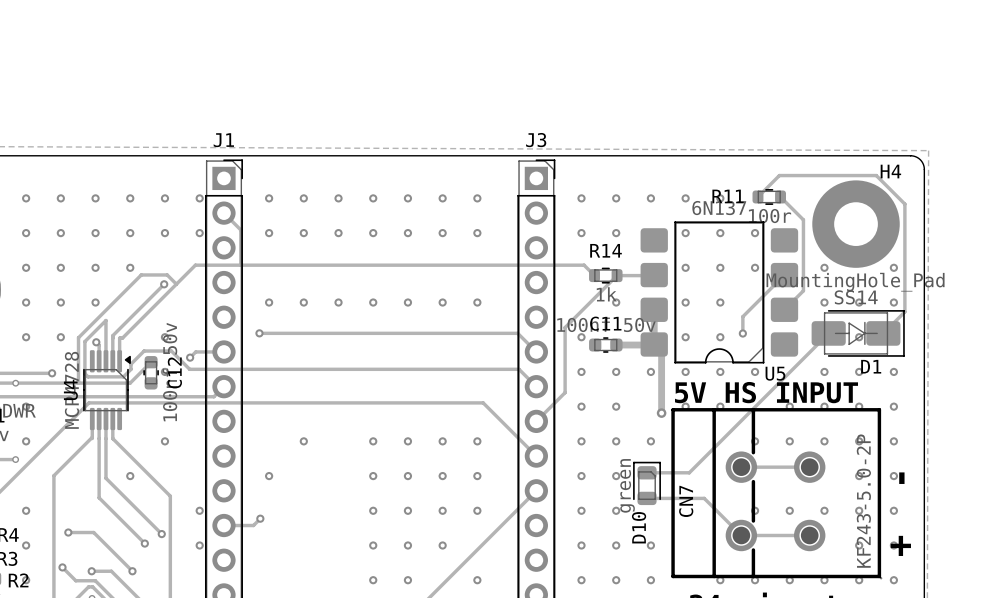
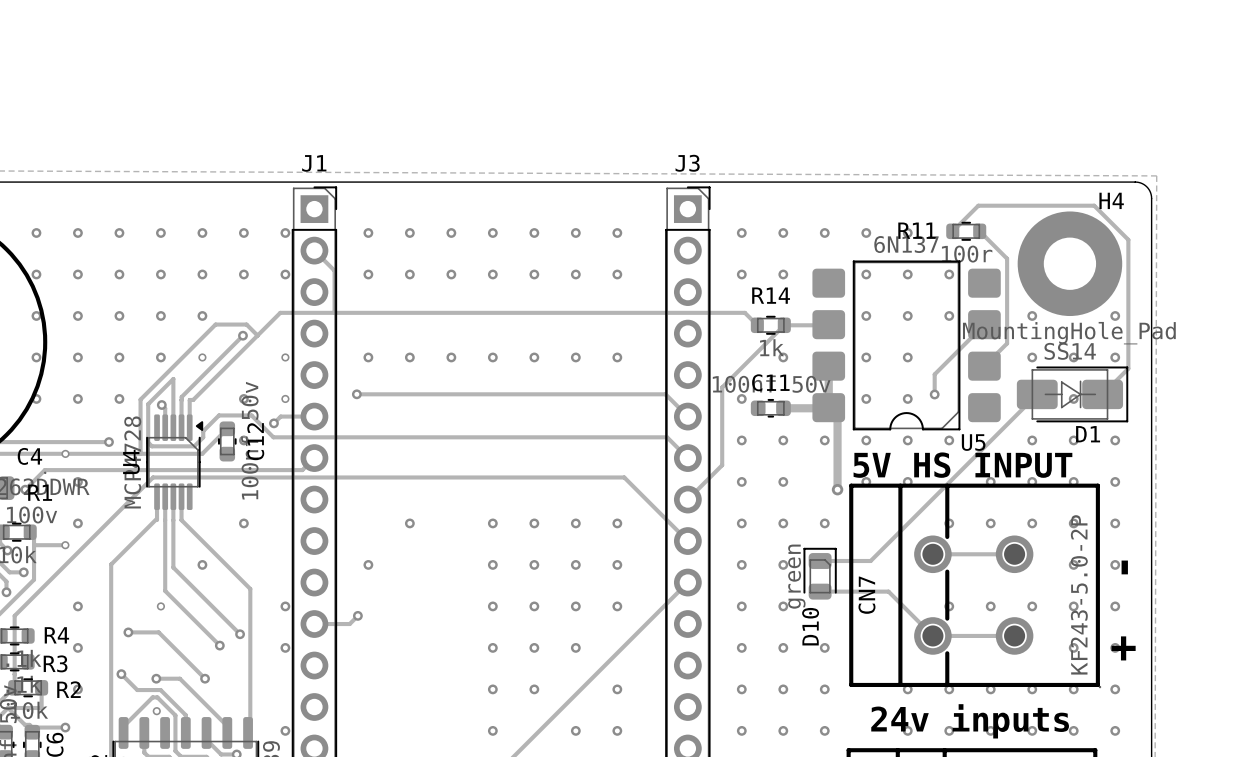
via: none -> (202, 357)
via: none -> (285, 357)
via: none -> (285, 398)
via: none -> (160, 606)

